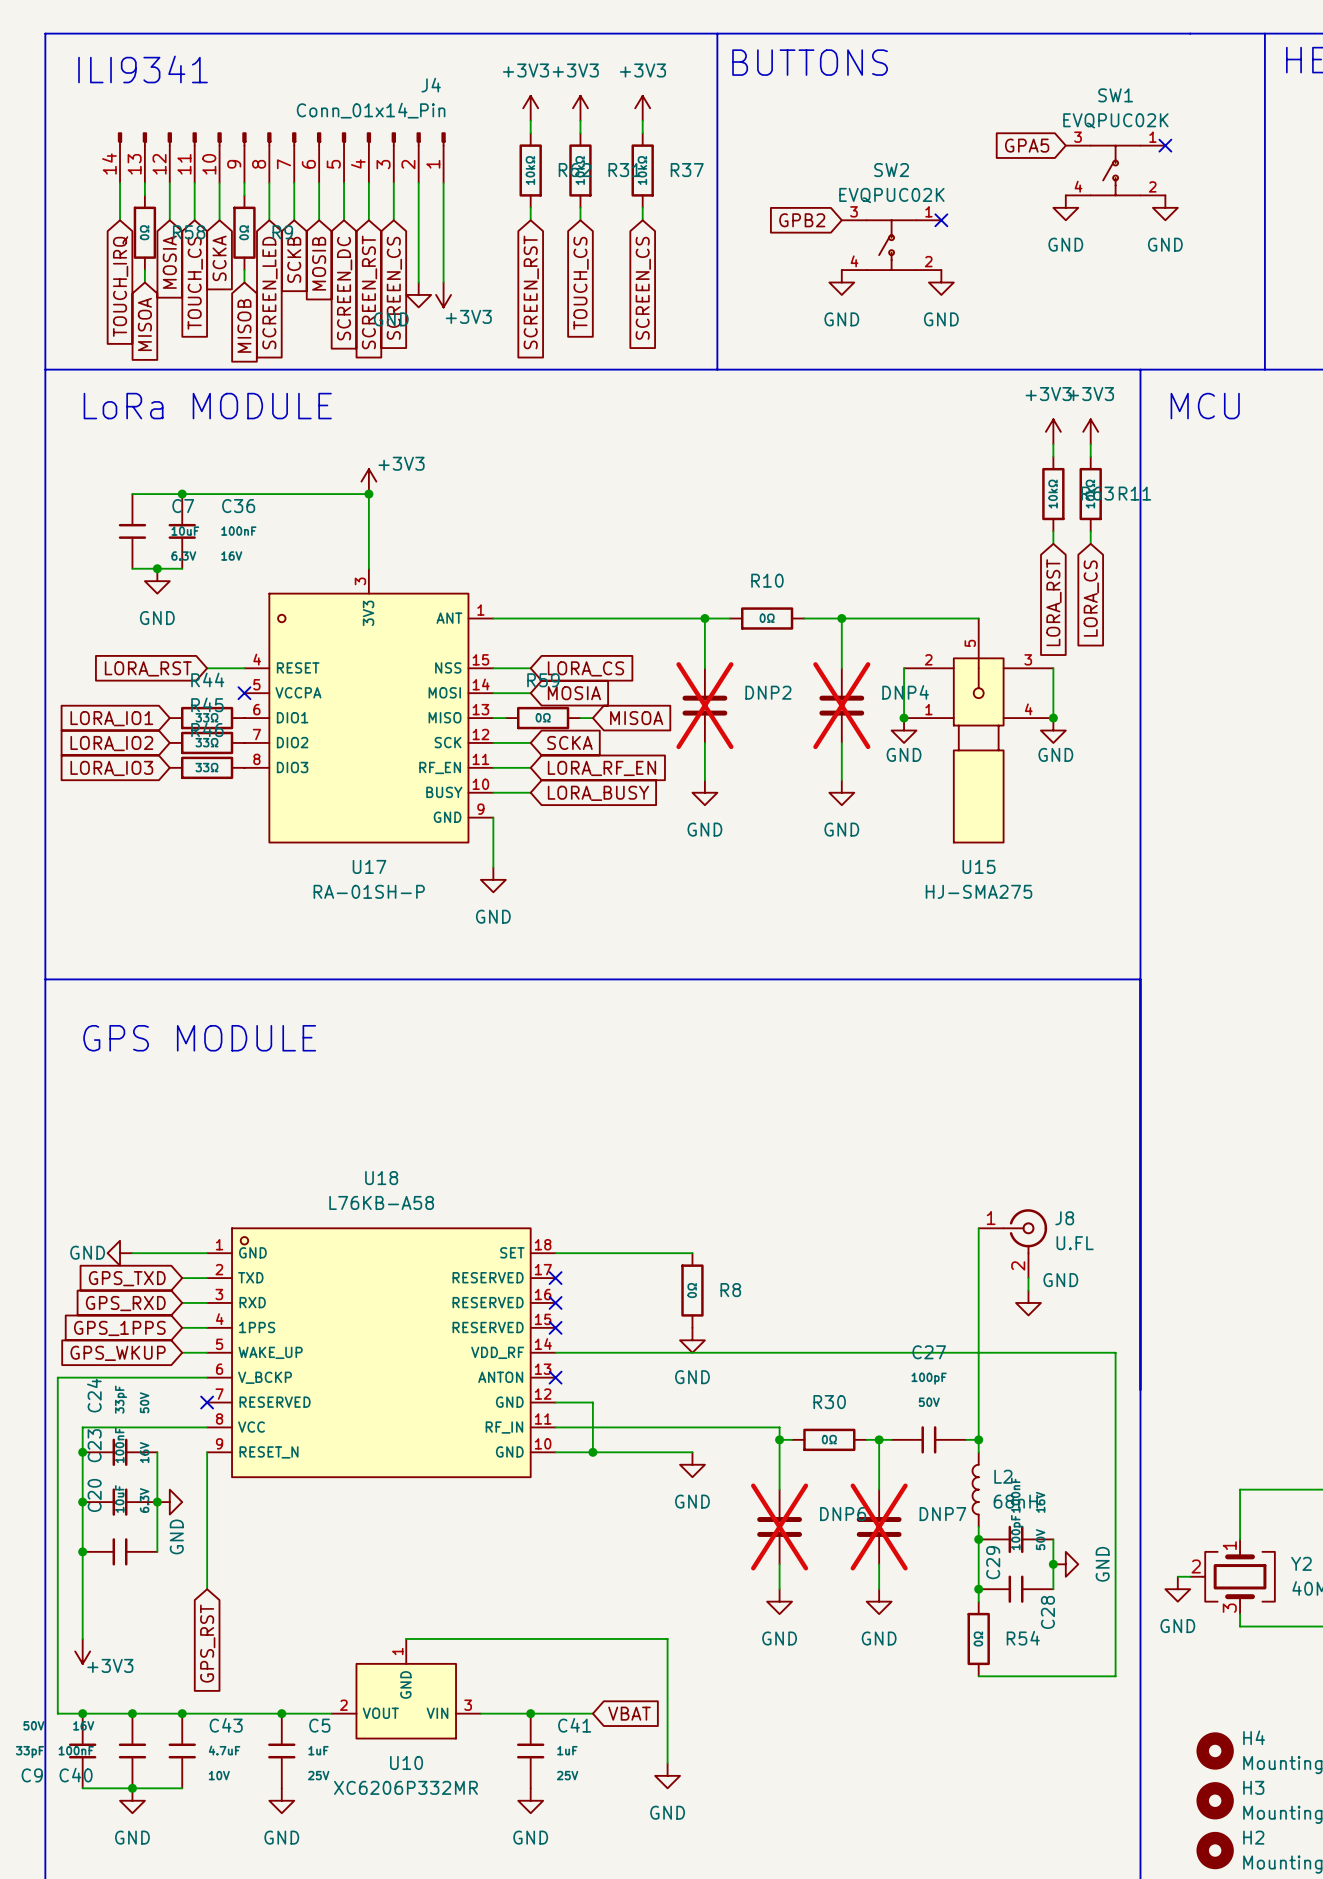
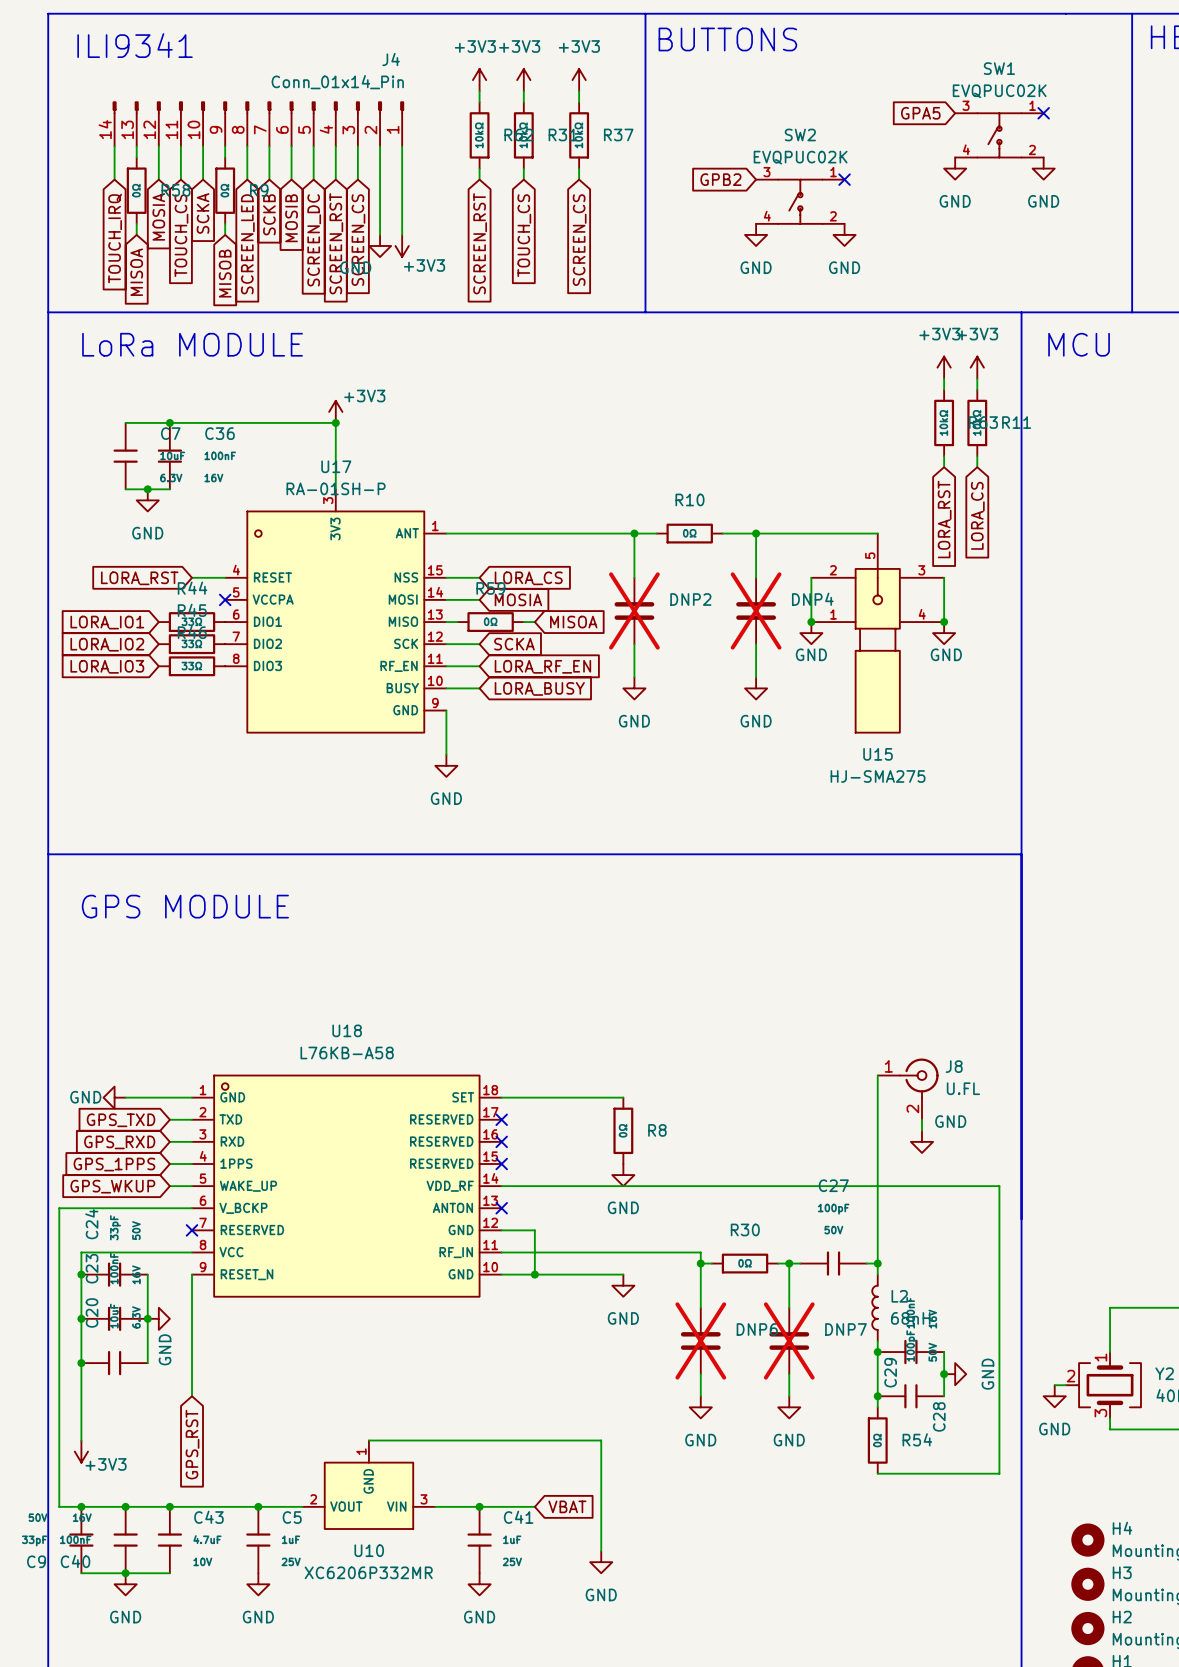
U17 name position: U17 (369, 866) -> U17 (336, 466)
U17 value position: RA-01SH-P (369, 891) -> RA-01SH-P (336, 488)

